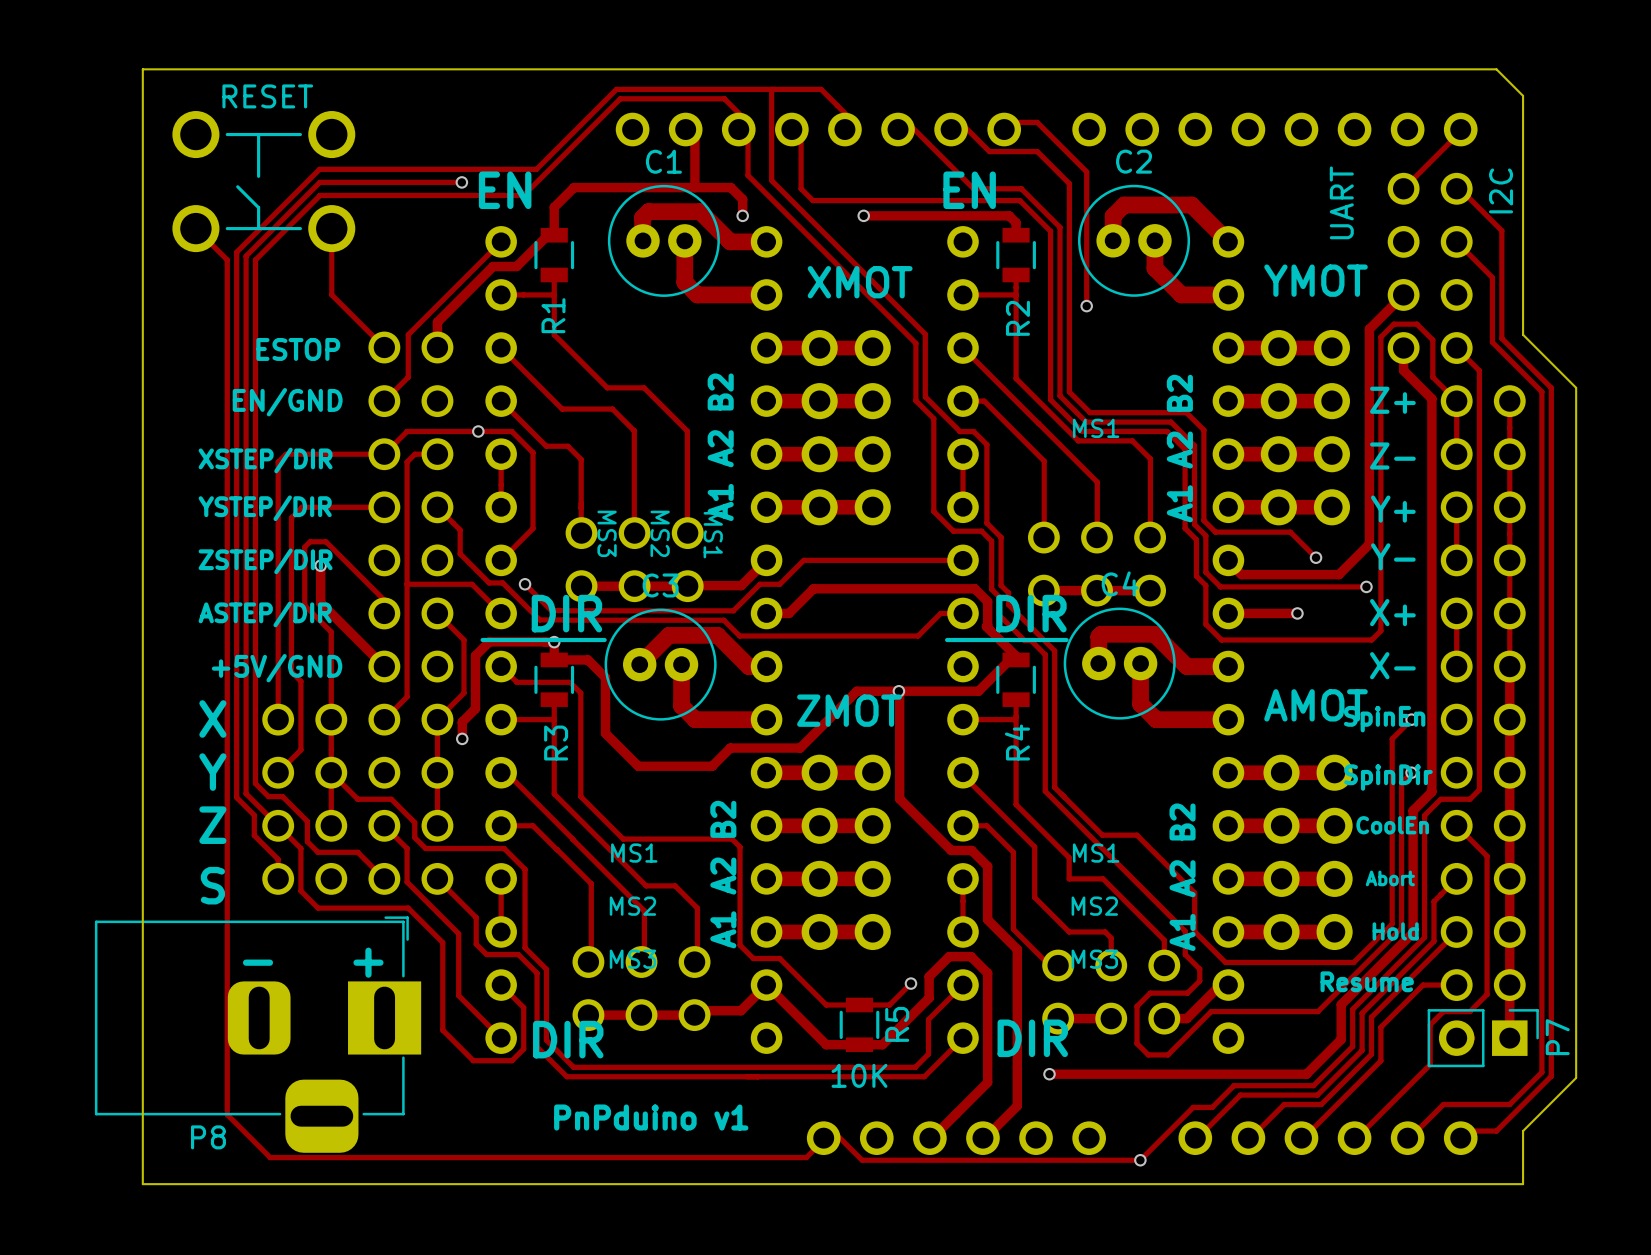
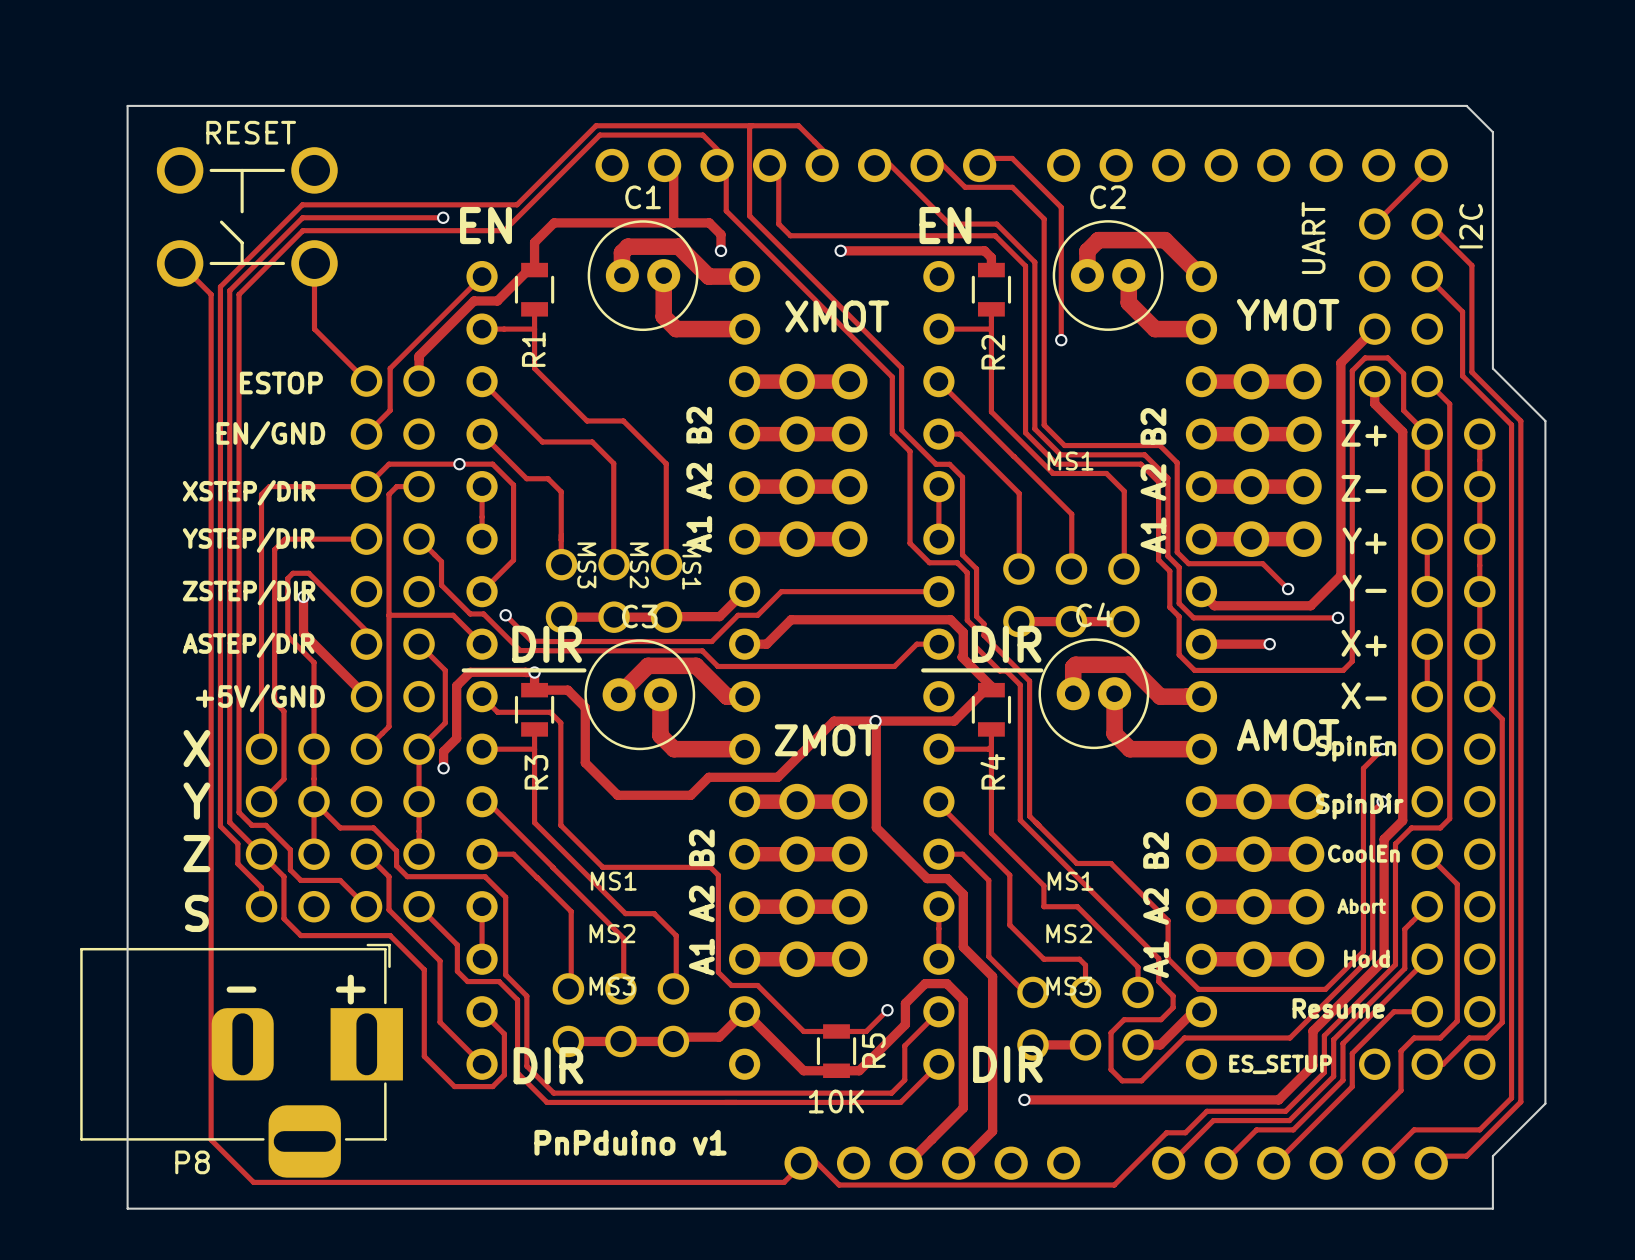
track: (1509, 666) (1509, 1038) -> (1479, 696) (1502, 719) (1502, 1022) (1486, 1037) (1469, 1037) (1443, 1064)
part: none -> ES_SETUP (1427, 1064)
P7: (1483, 1038) -> none
via: (1140, 1160) -> none

